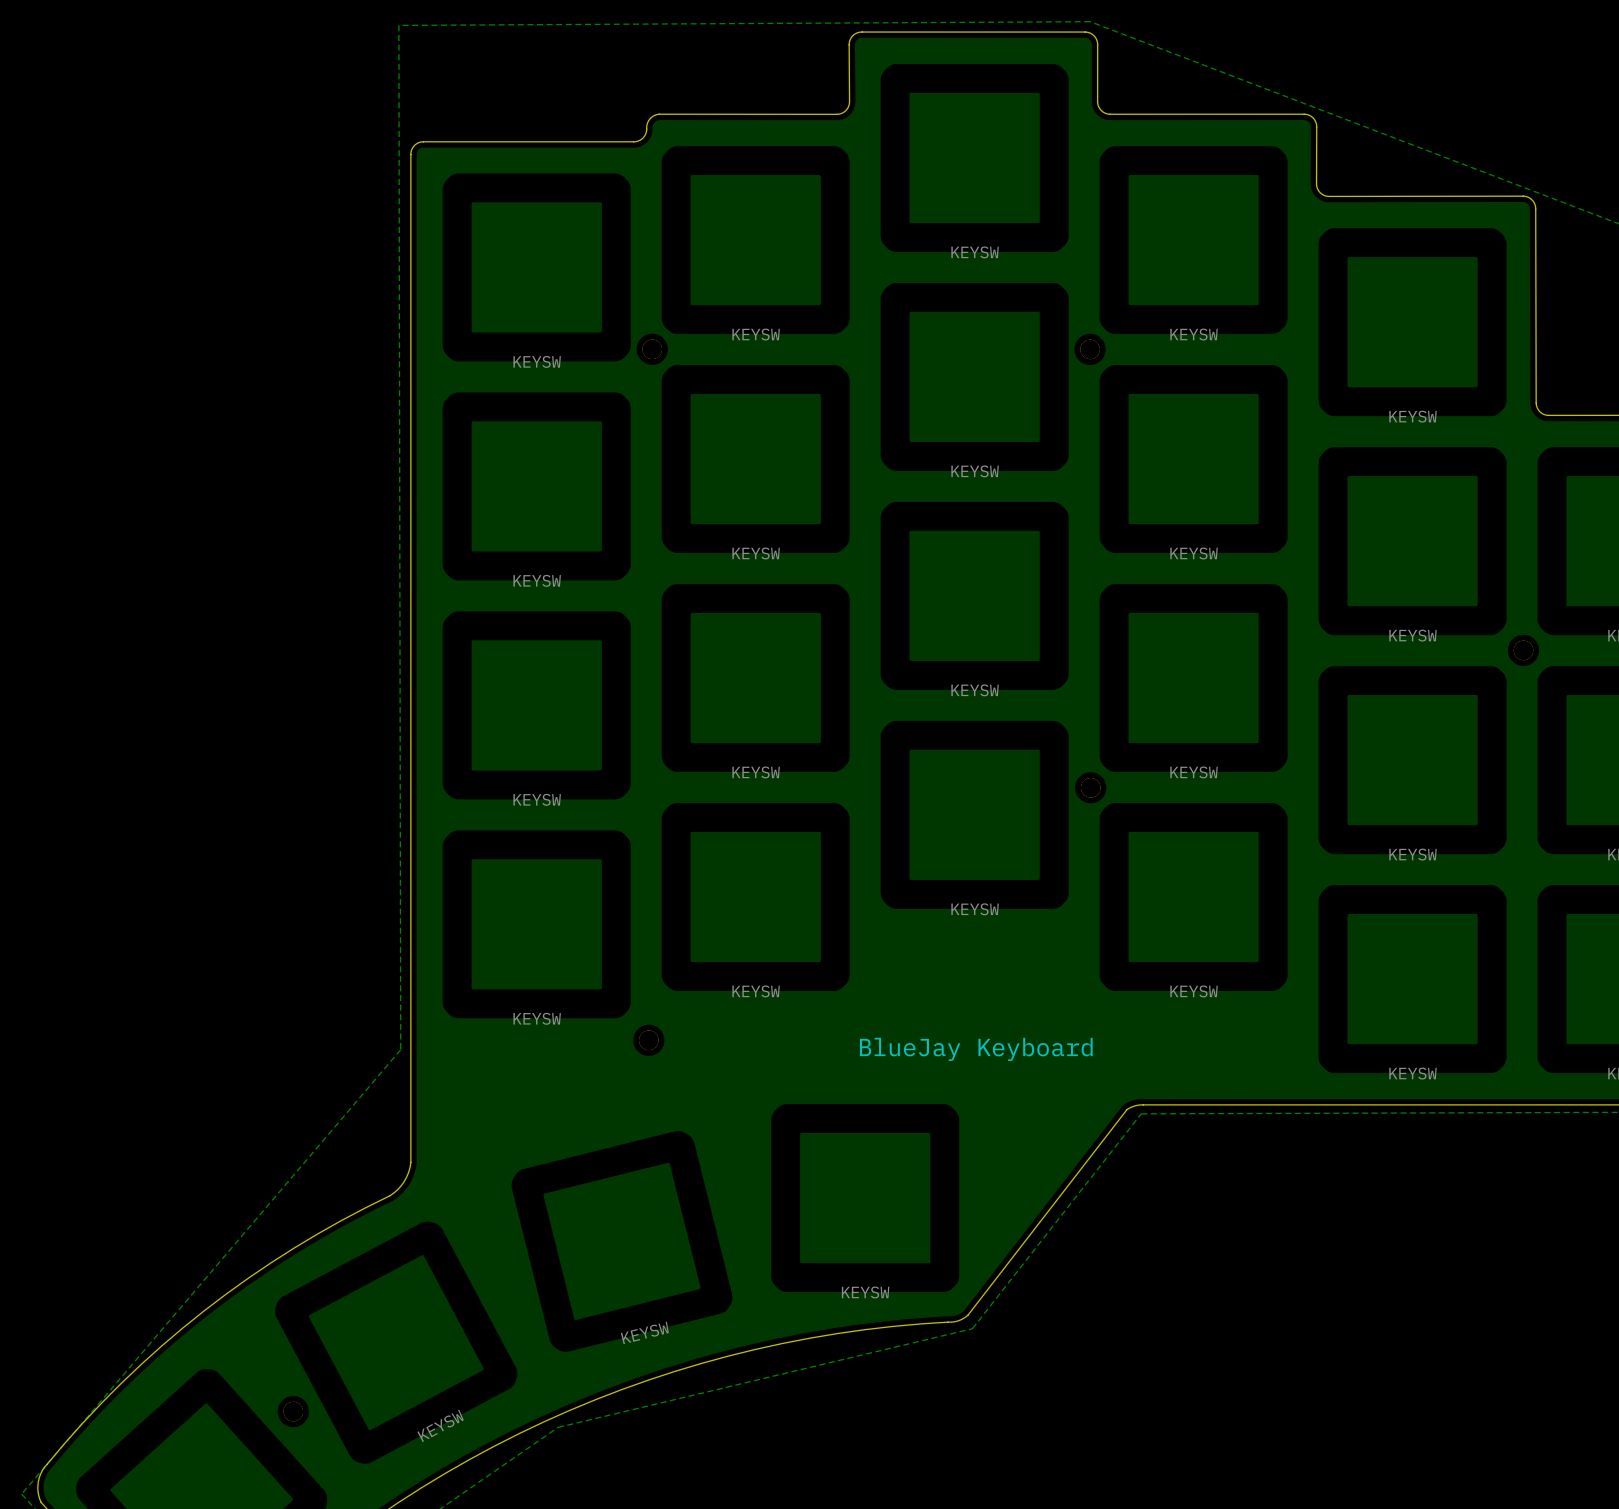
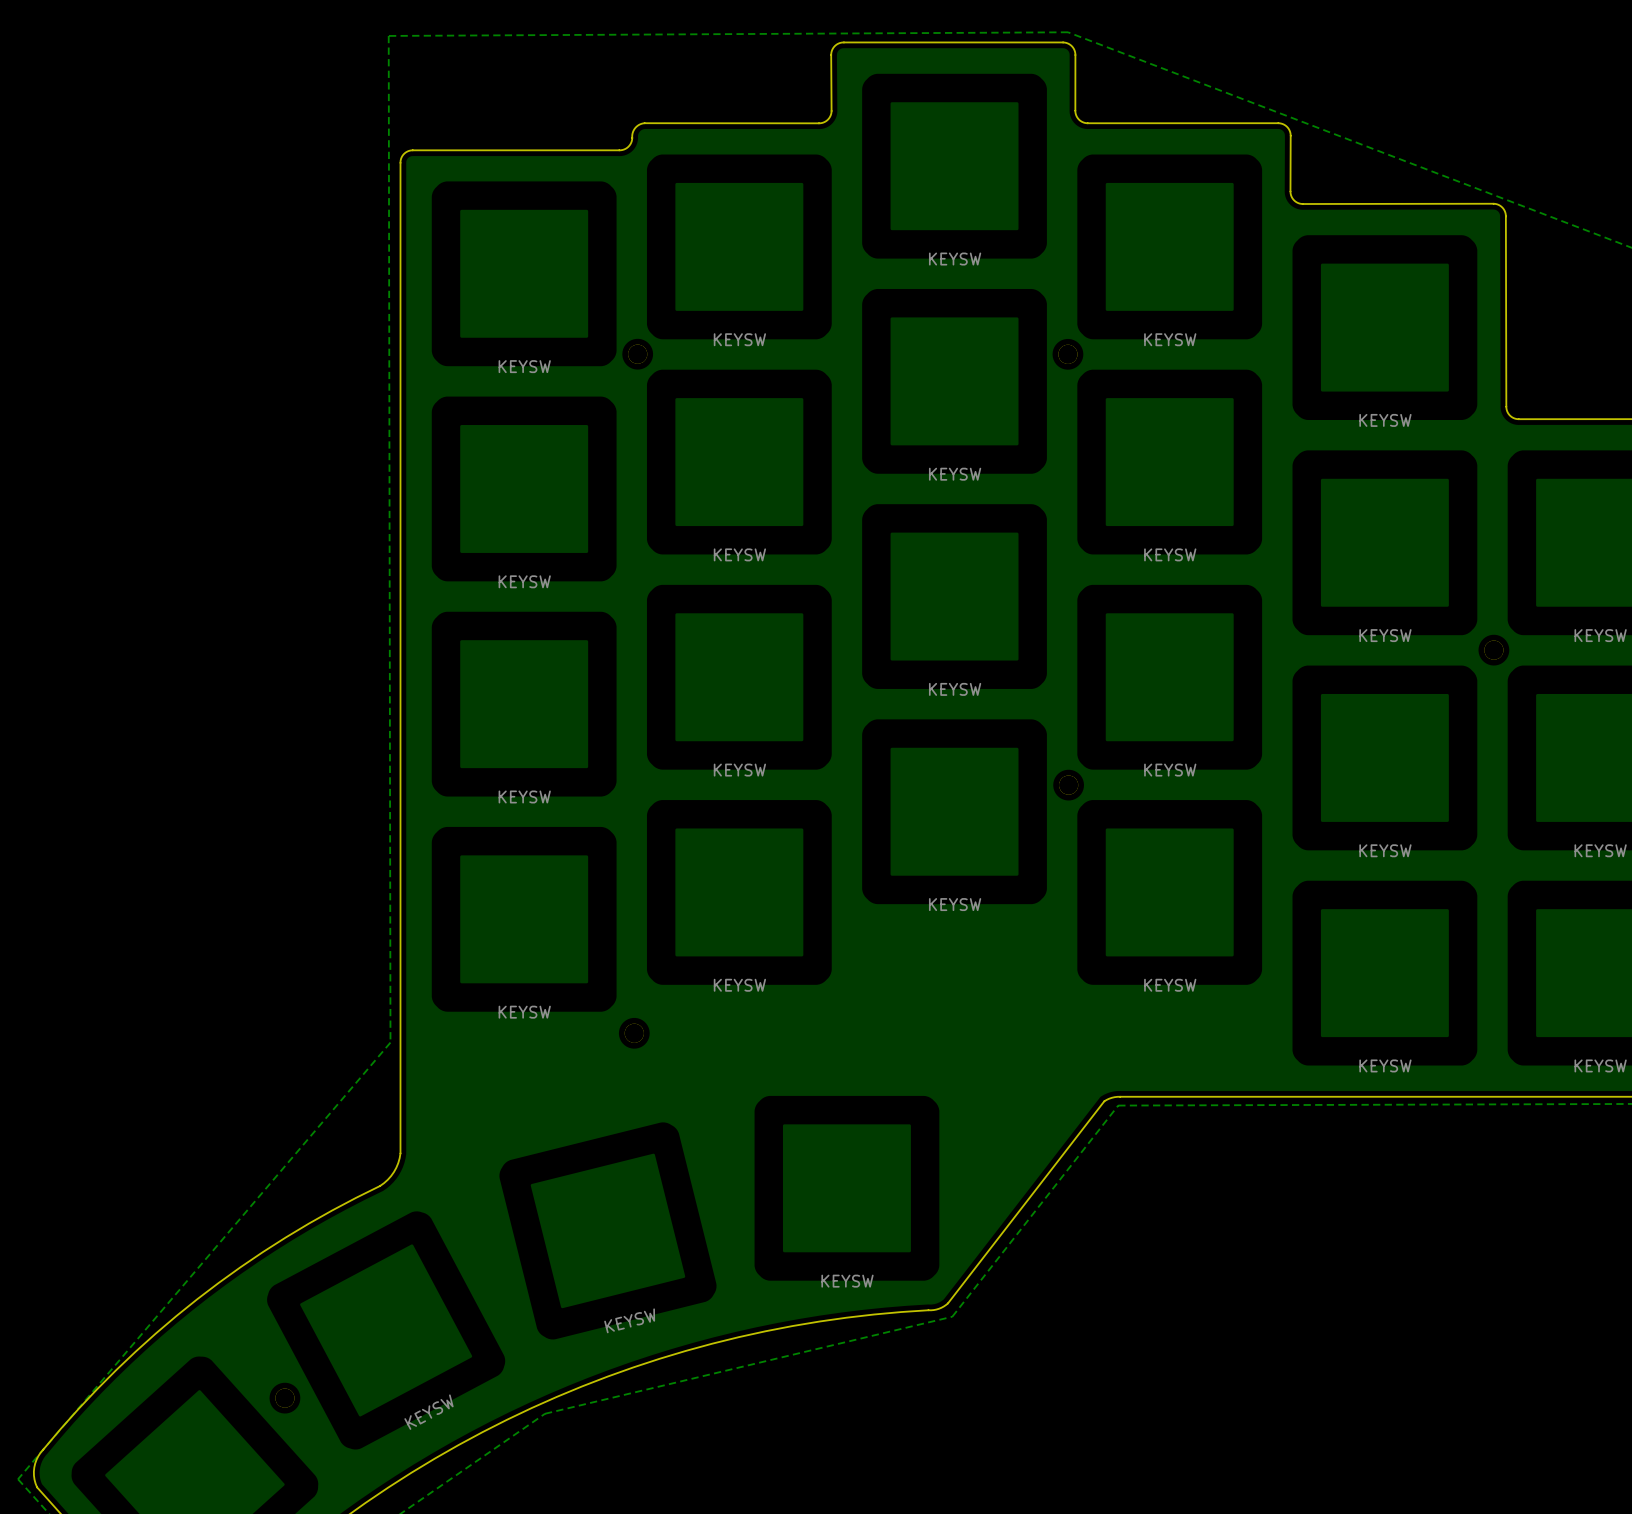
text: BlueJay Keyboard (976, 1049) -> none

